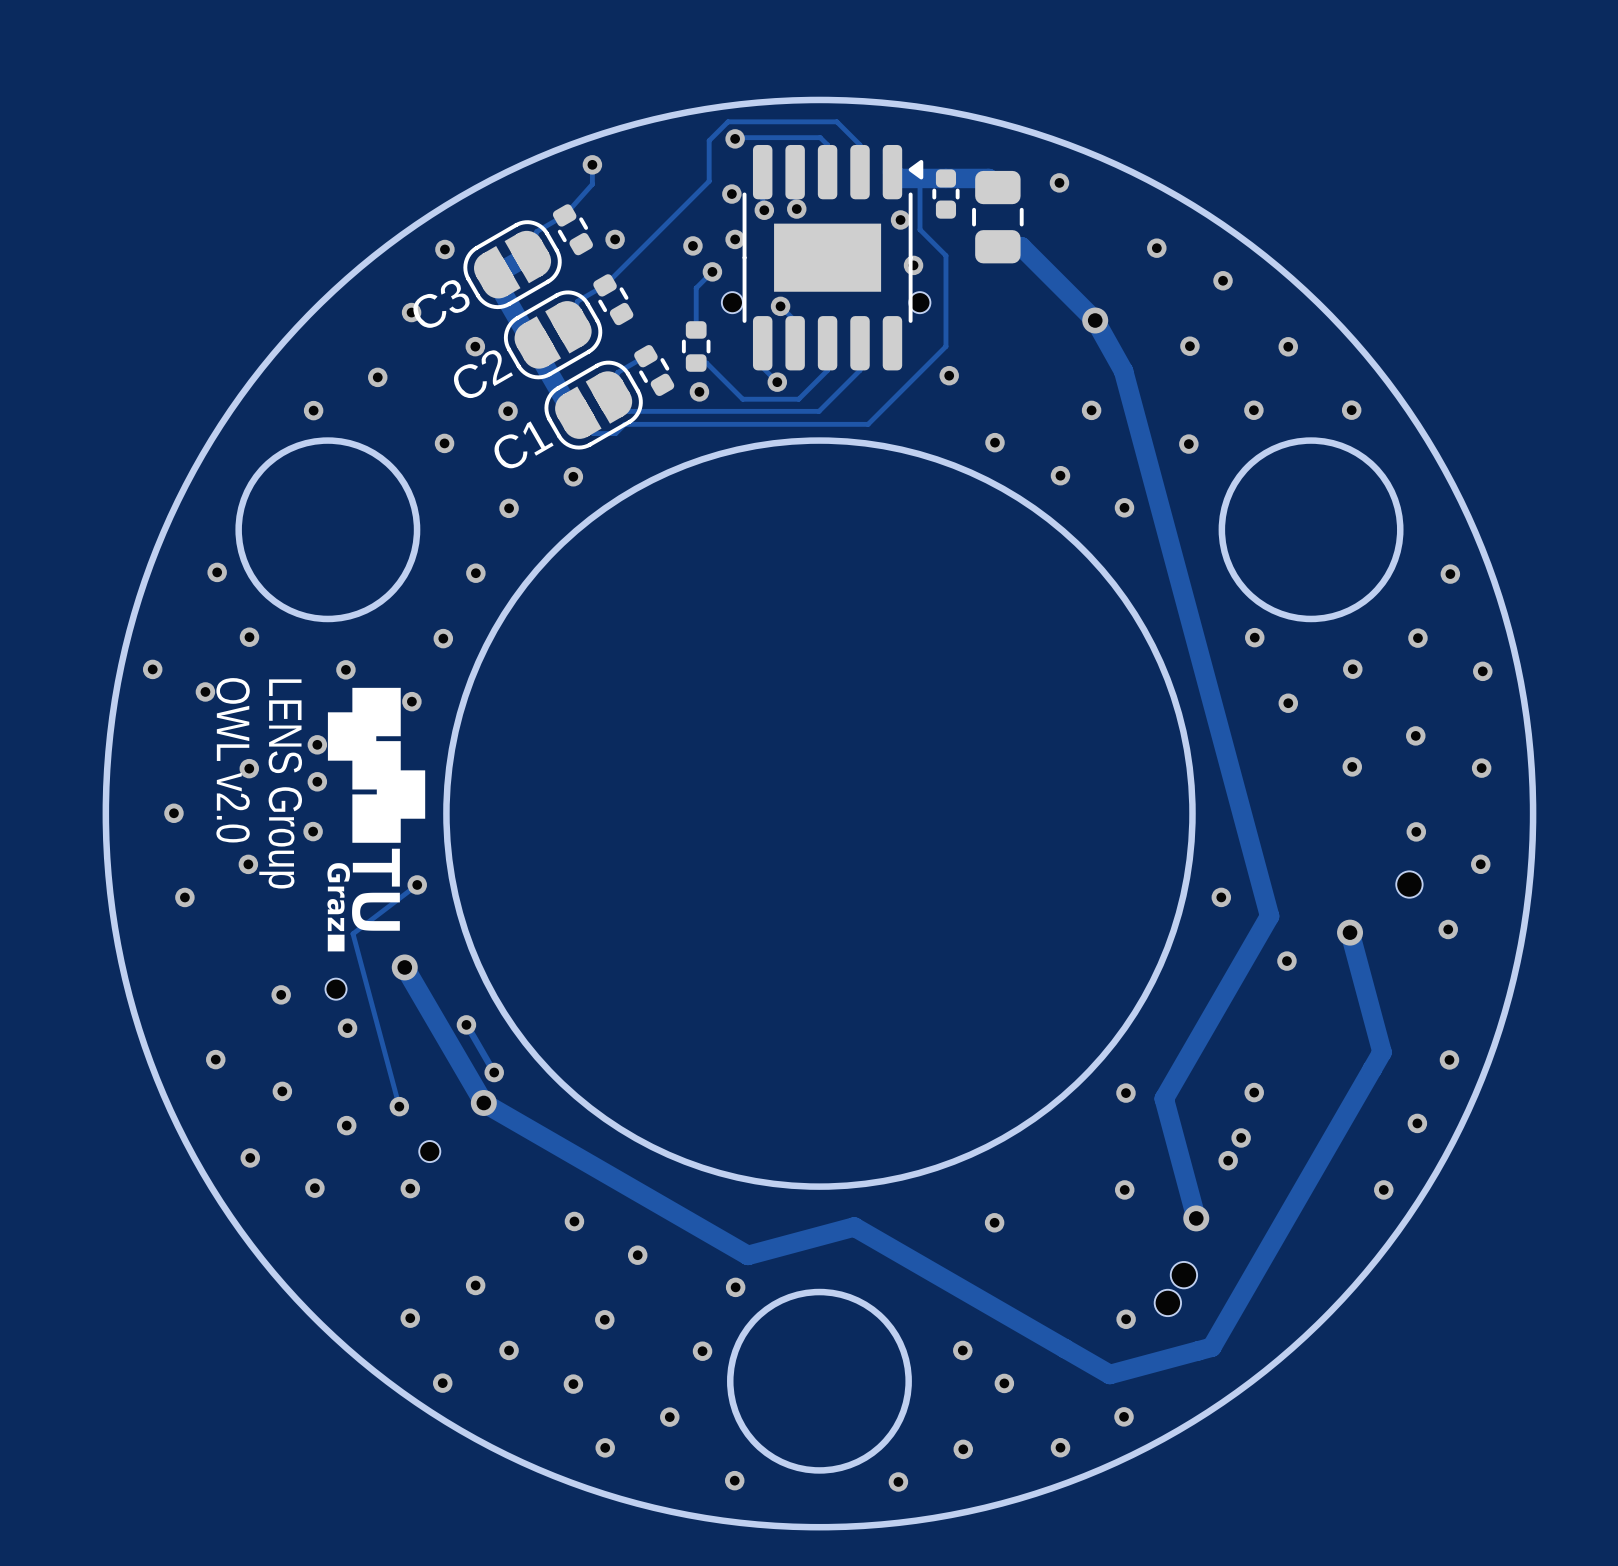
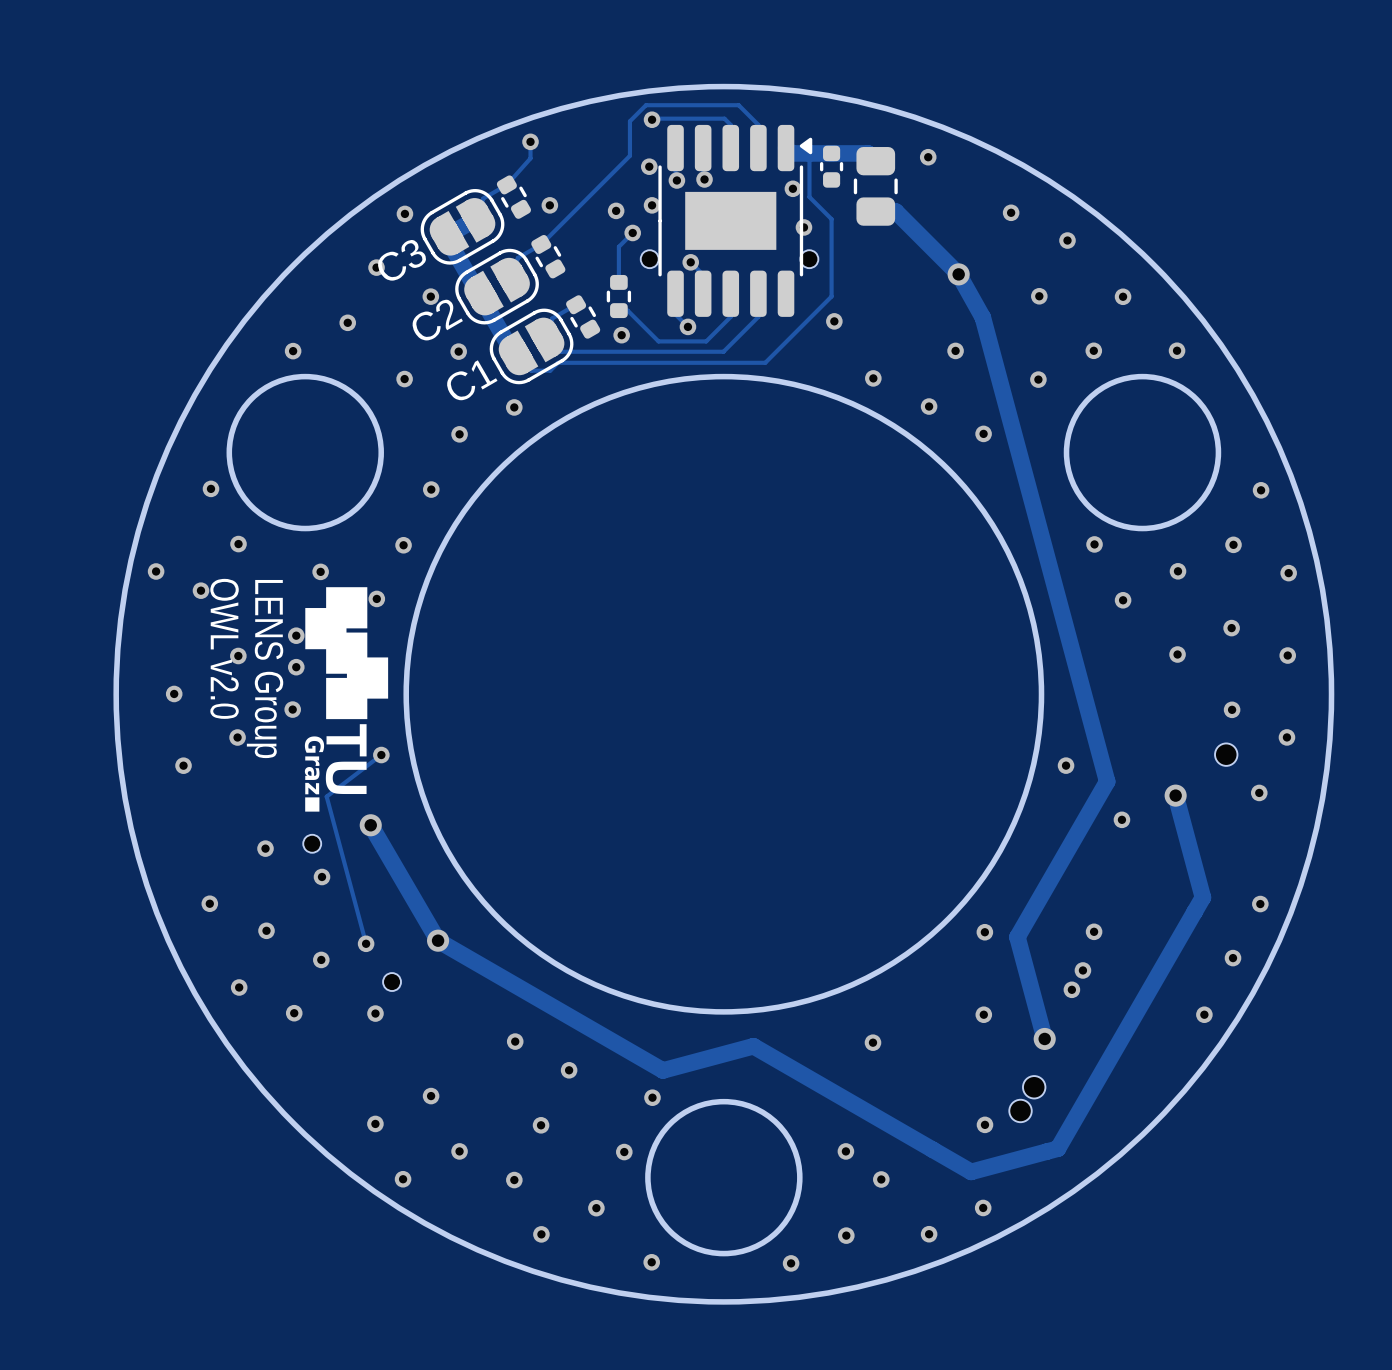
track: (466, 1024) (494, 1072) -> none
via: (466, 1024) -> none
via: (494, 1072) -> none

